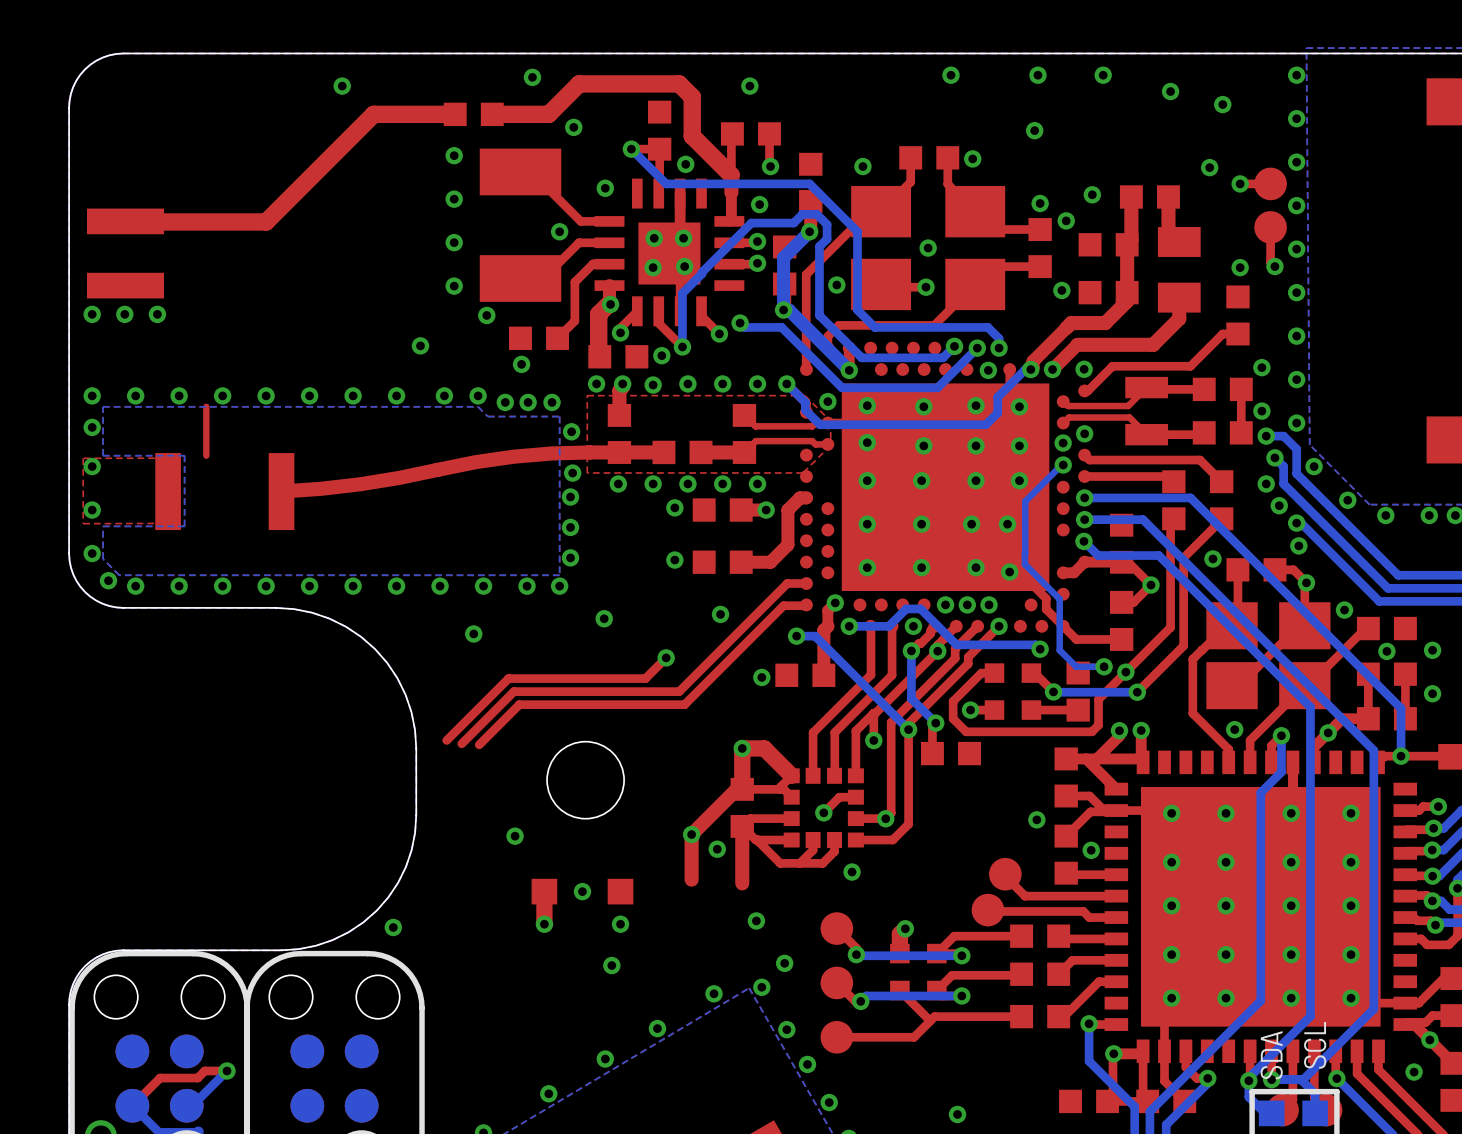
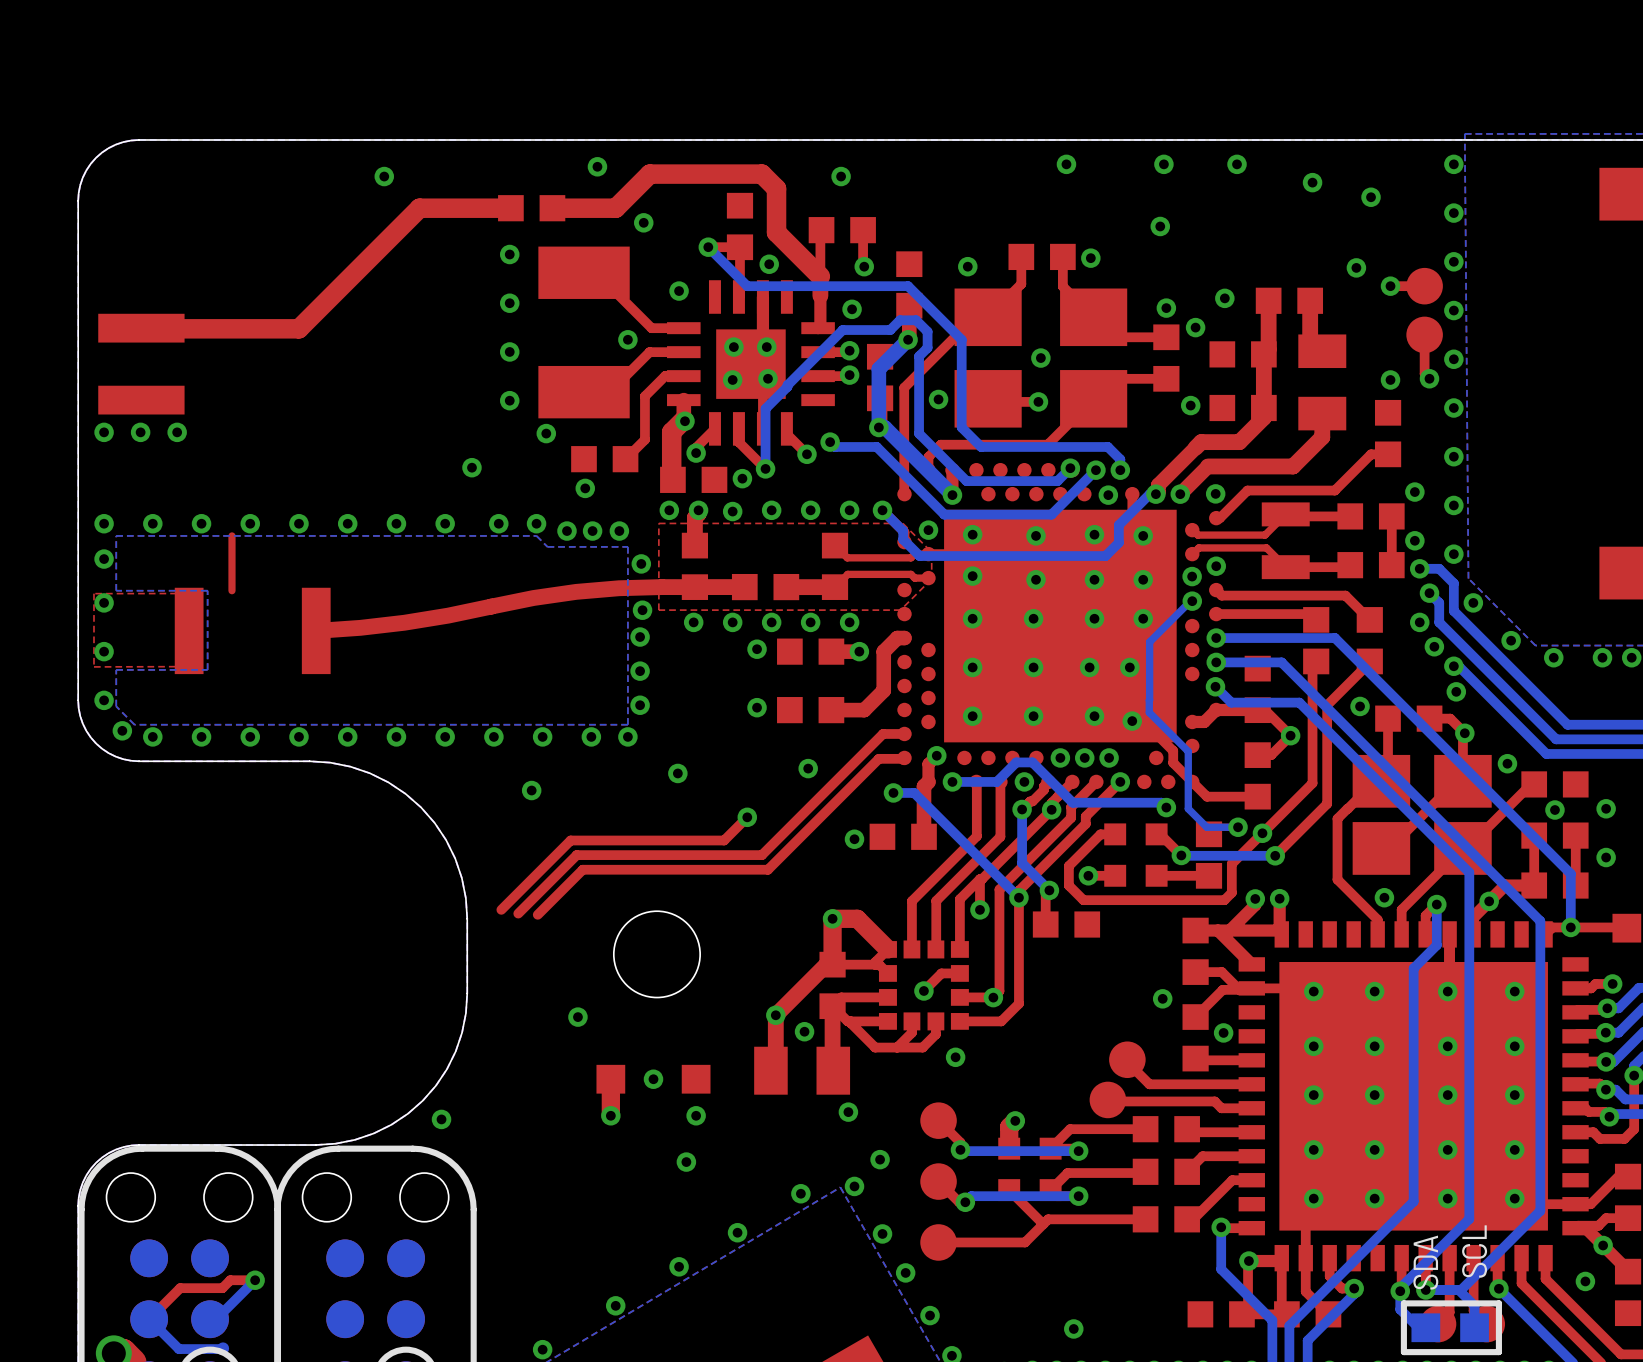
part: none -> (802, 1070)

